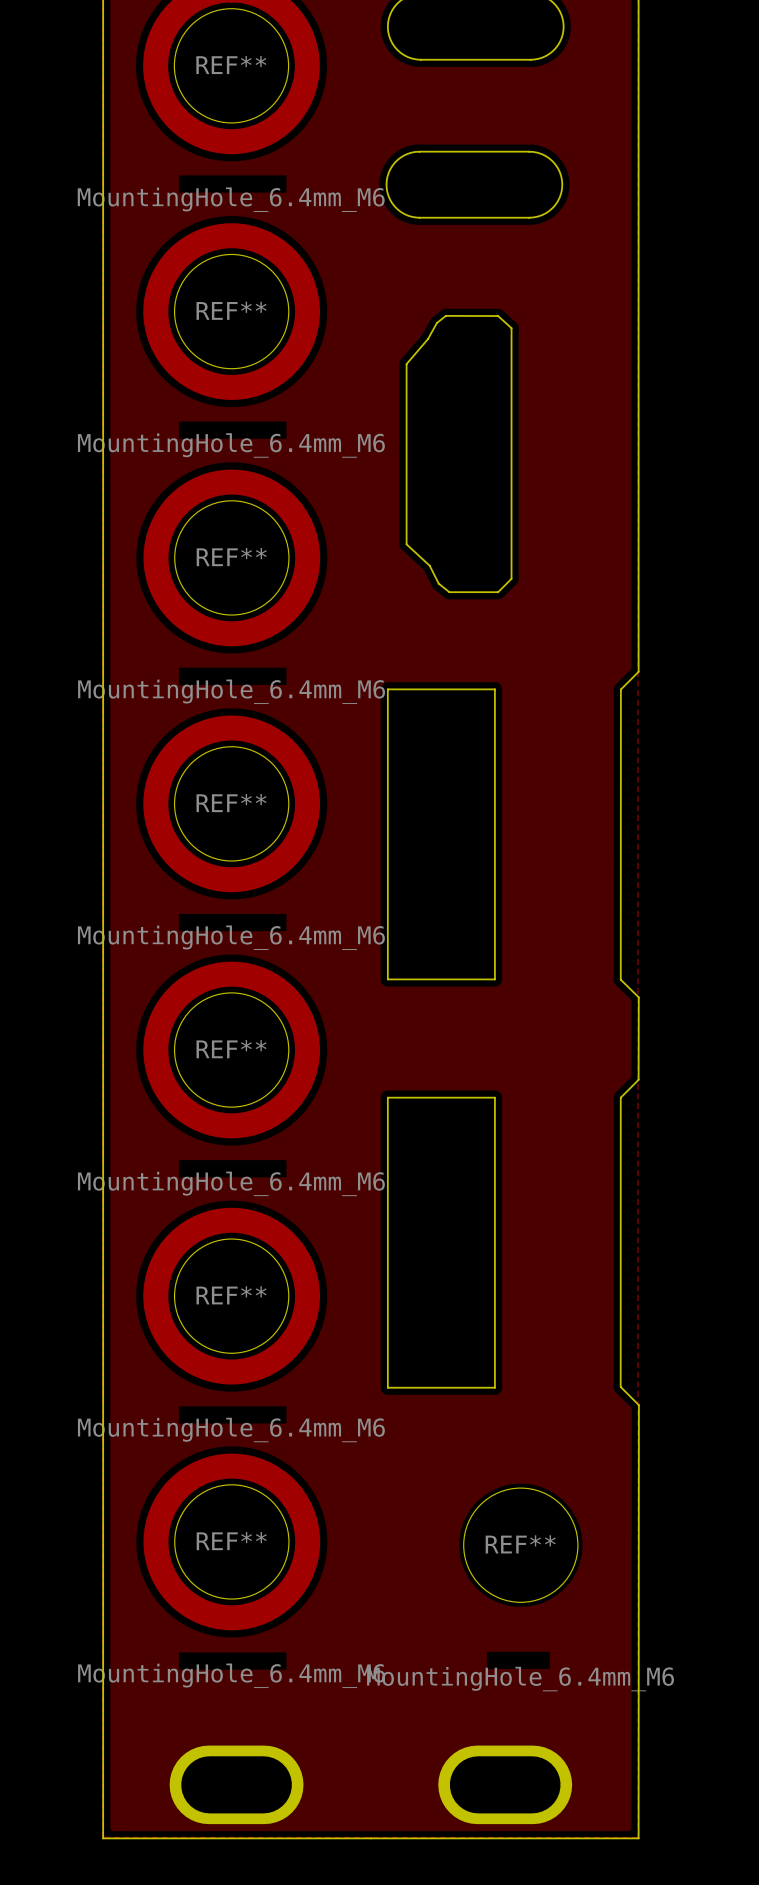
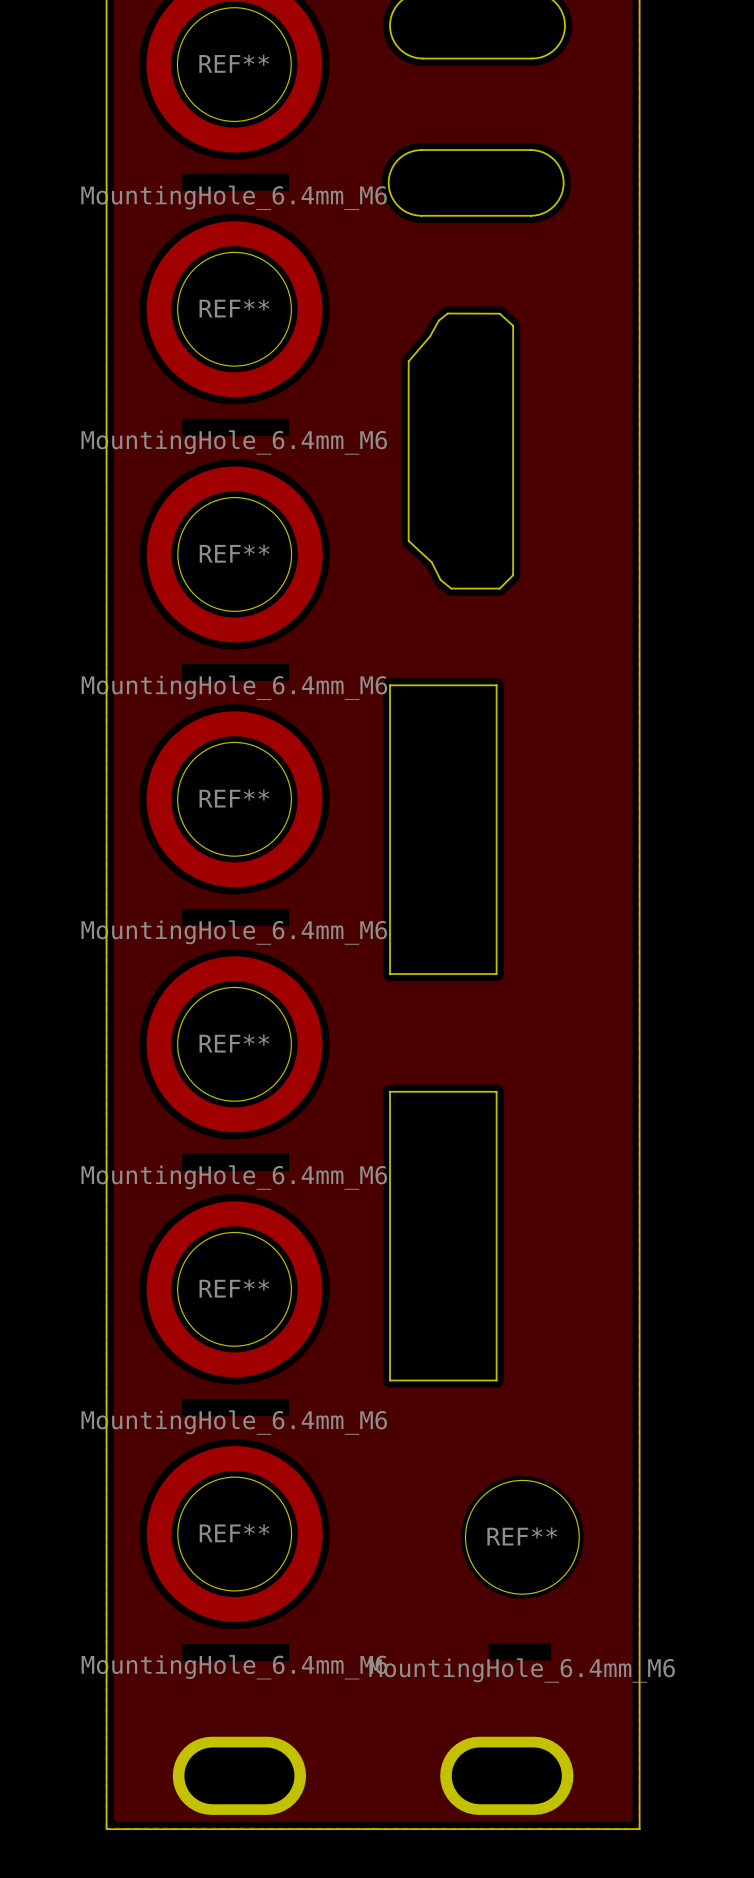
board edge: (638, 671) (620, 689) (620, 979) (638, 997) (638, 1079) (620, 1097) (620, 1386) (638, 1405) (638, 1838) -> (639, 667) (639, 1829)

